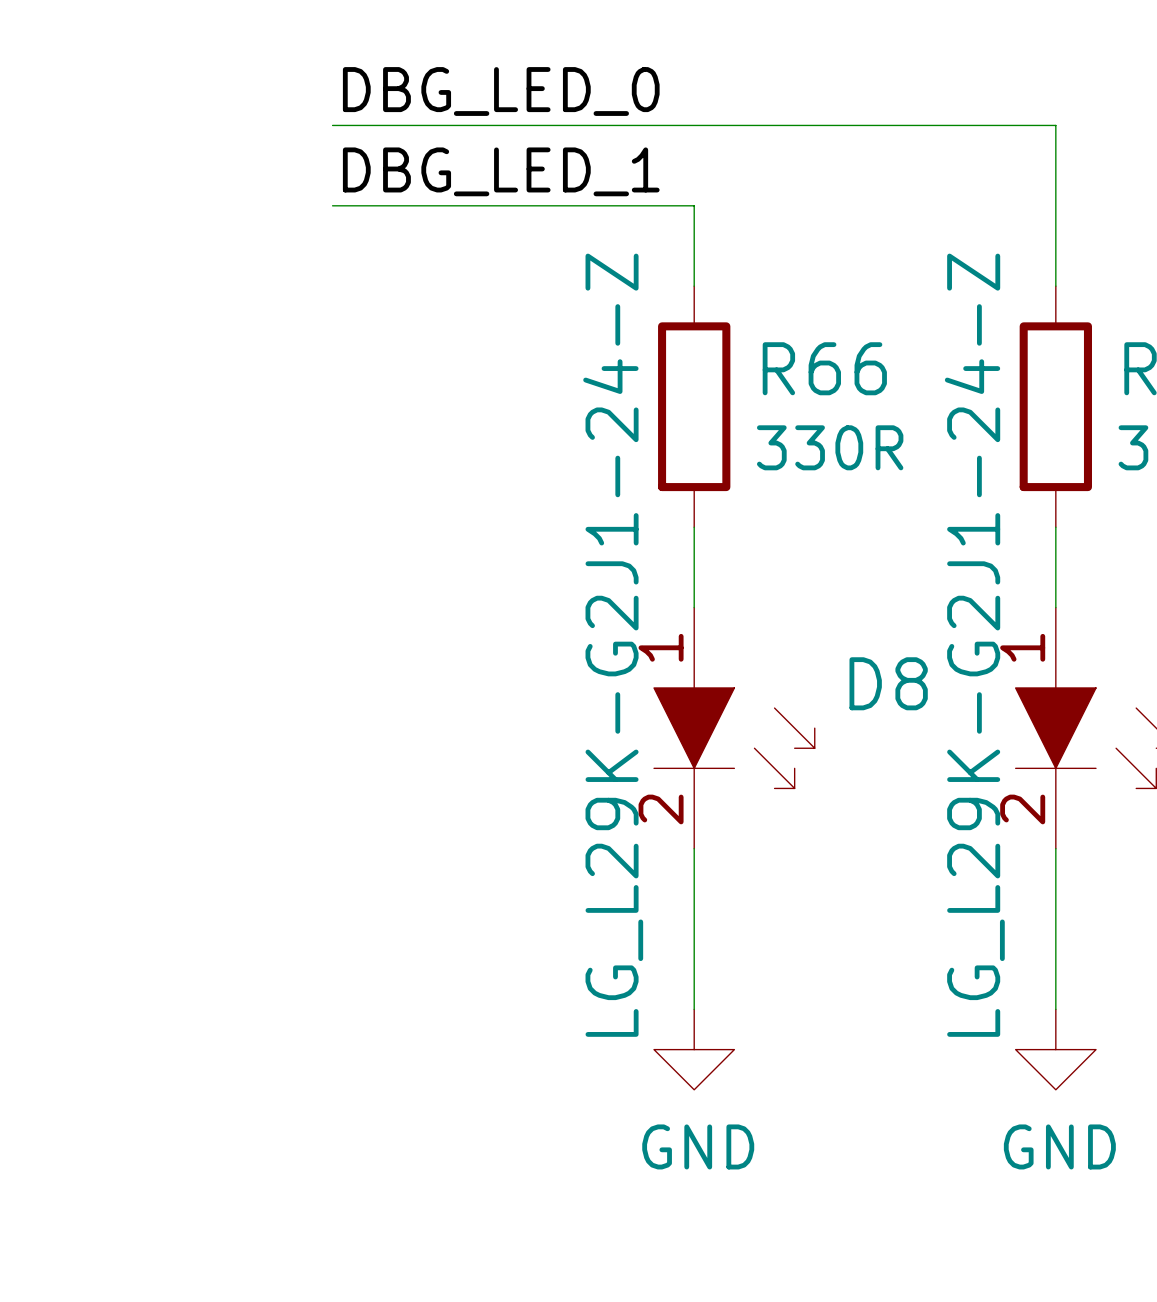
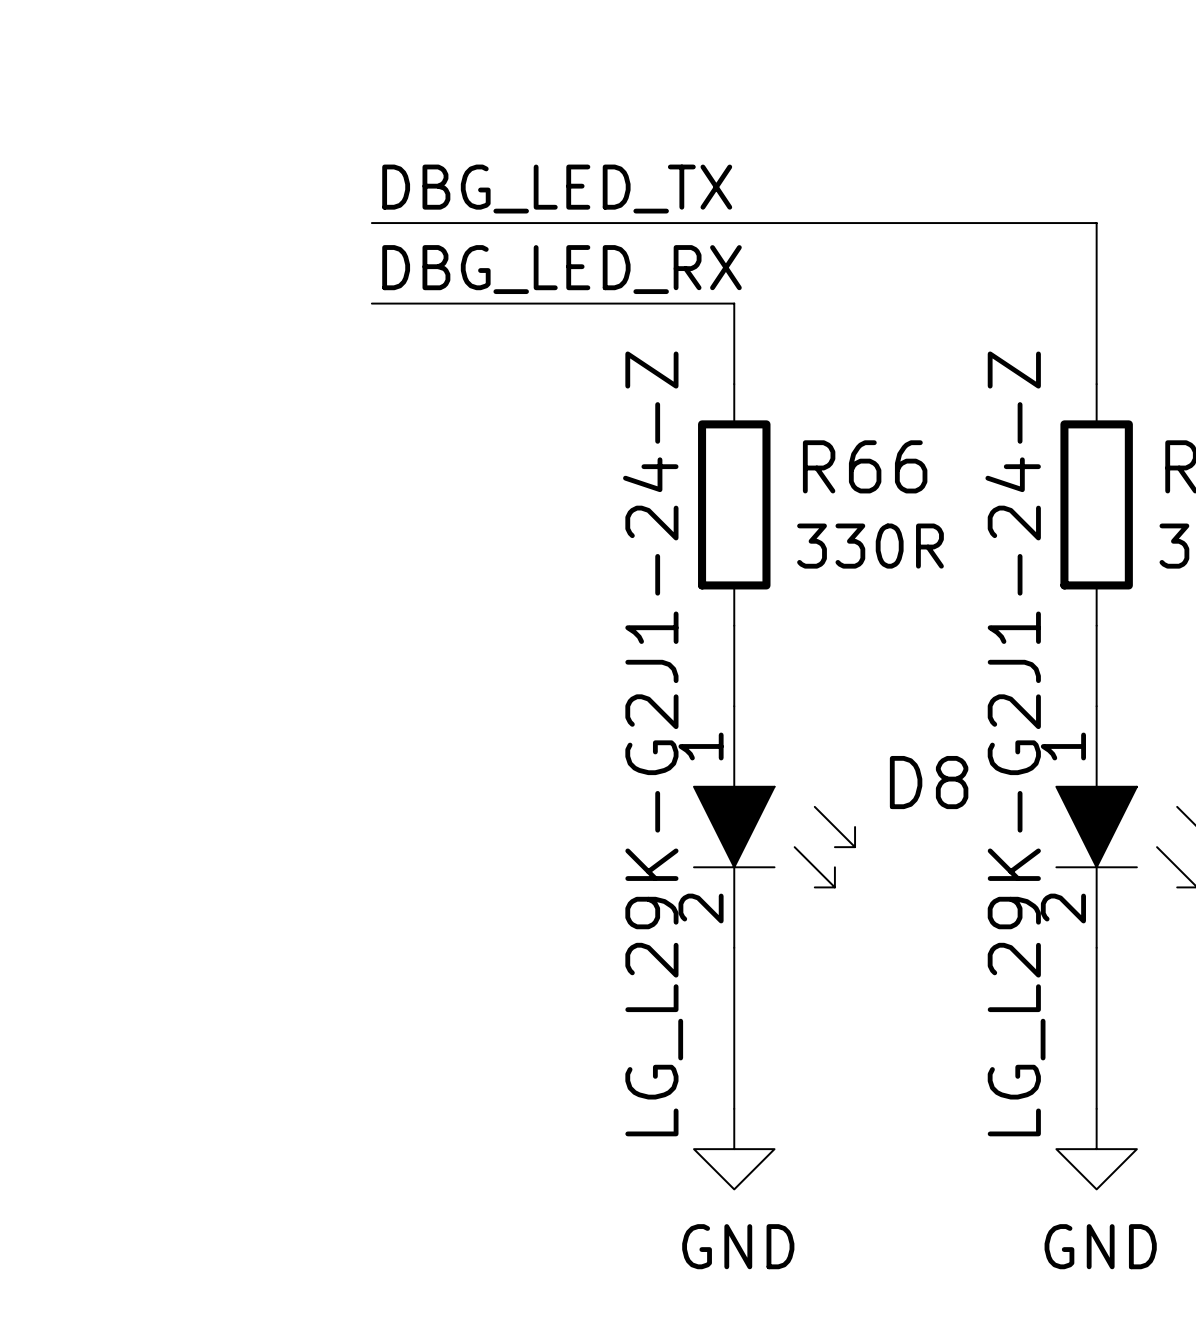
label: DBG_LED_0 (501, 91) -> DBG_LED_TX (557, 189)
label: DBG_LED_1 (501, 171) -> DBG_LED_RX (562, 269)

